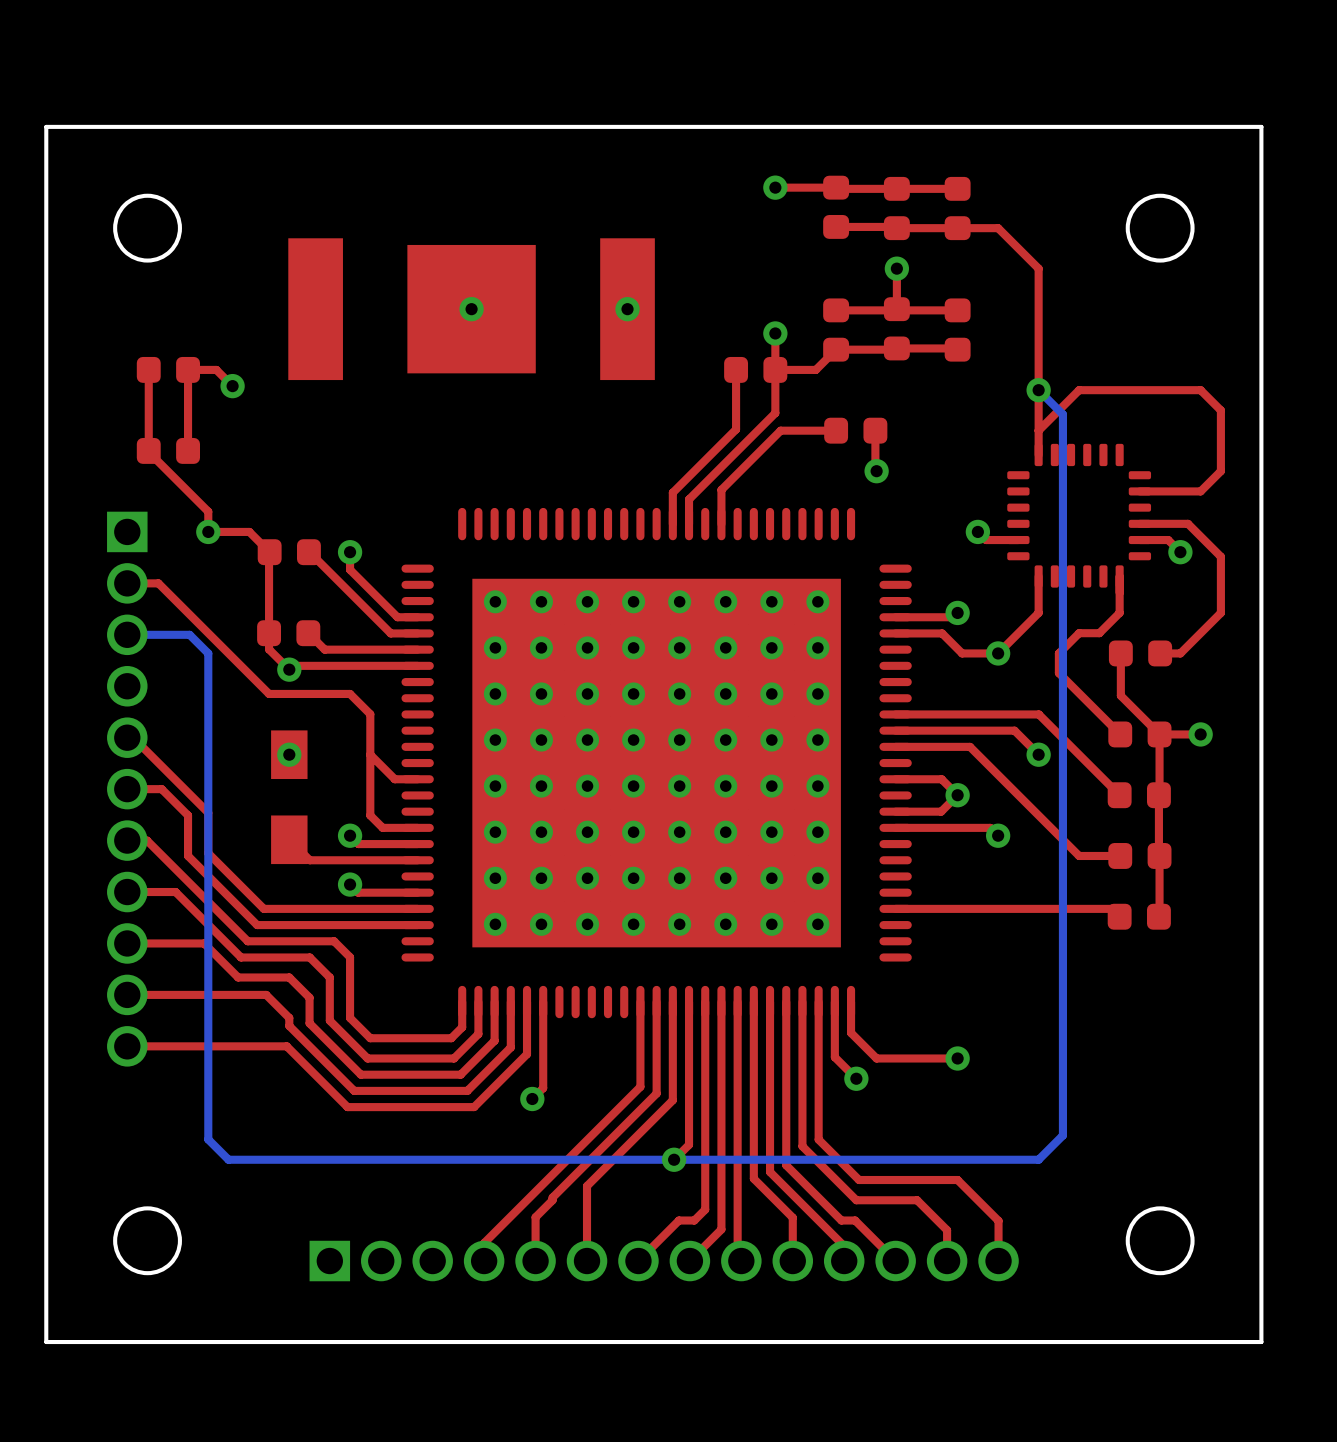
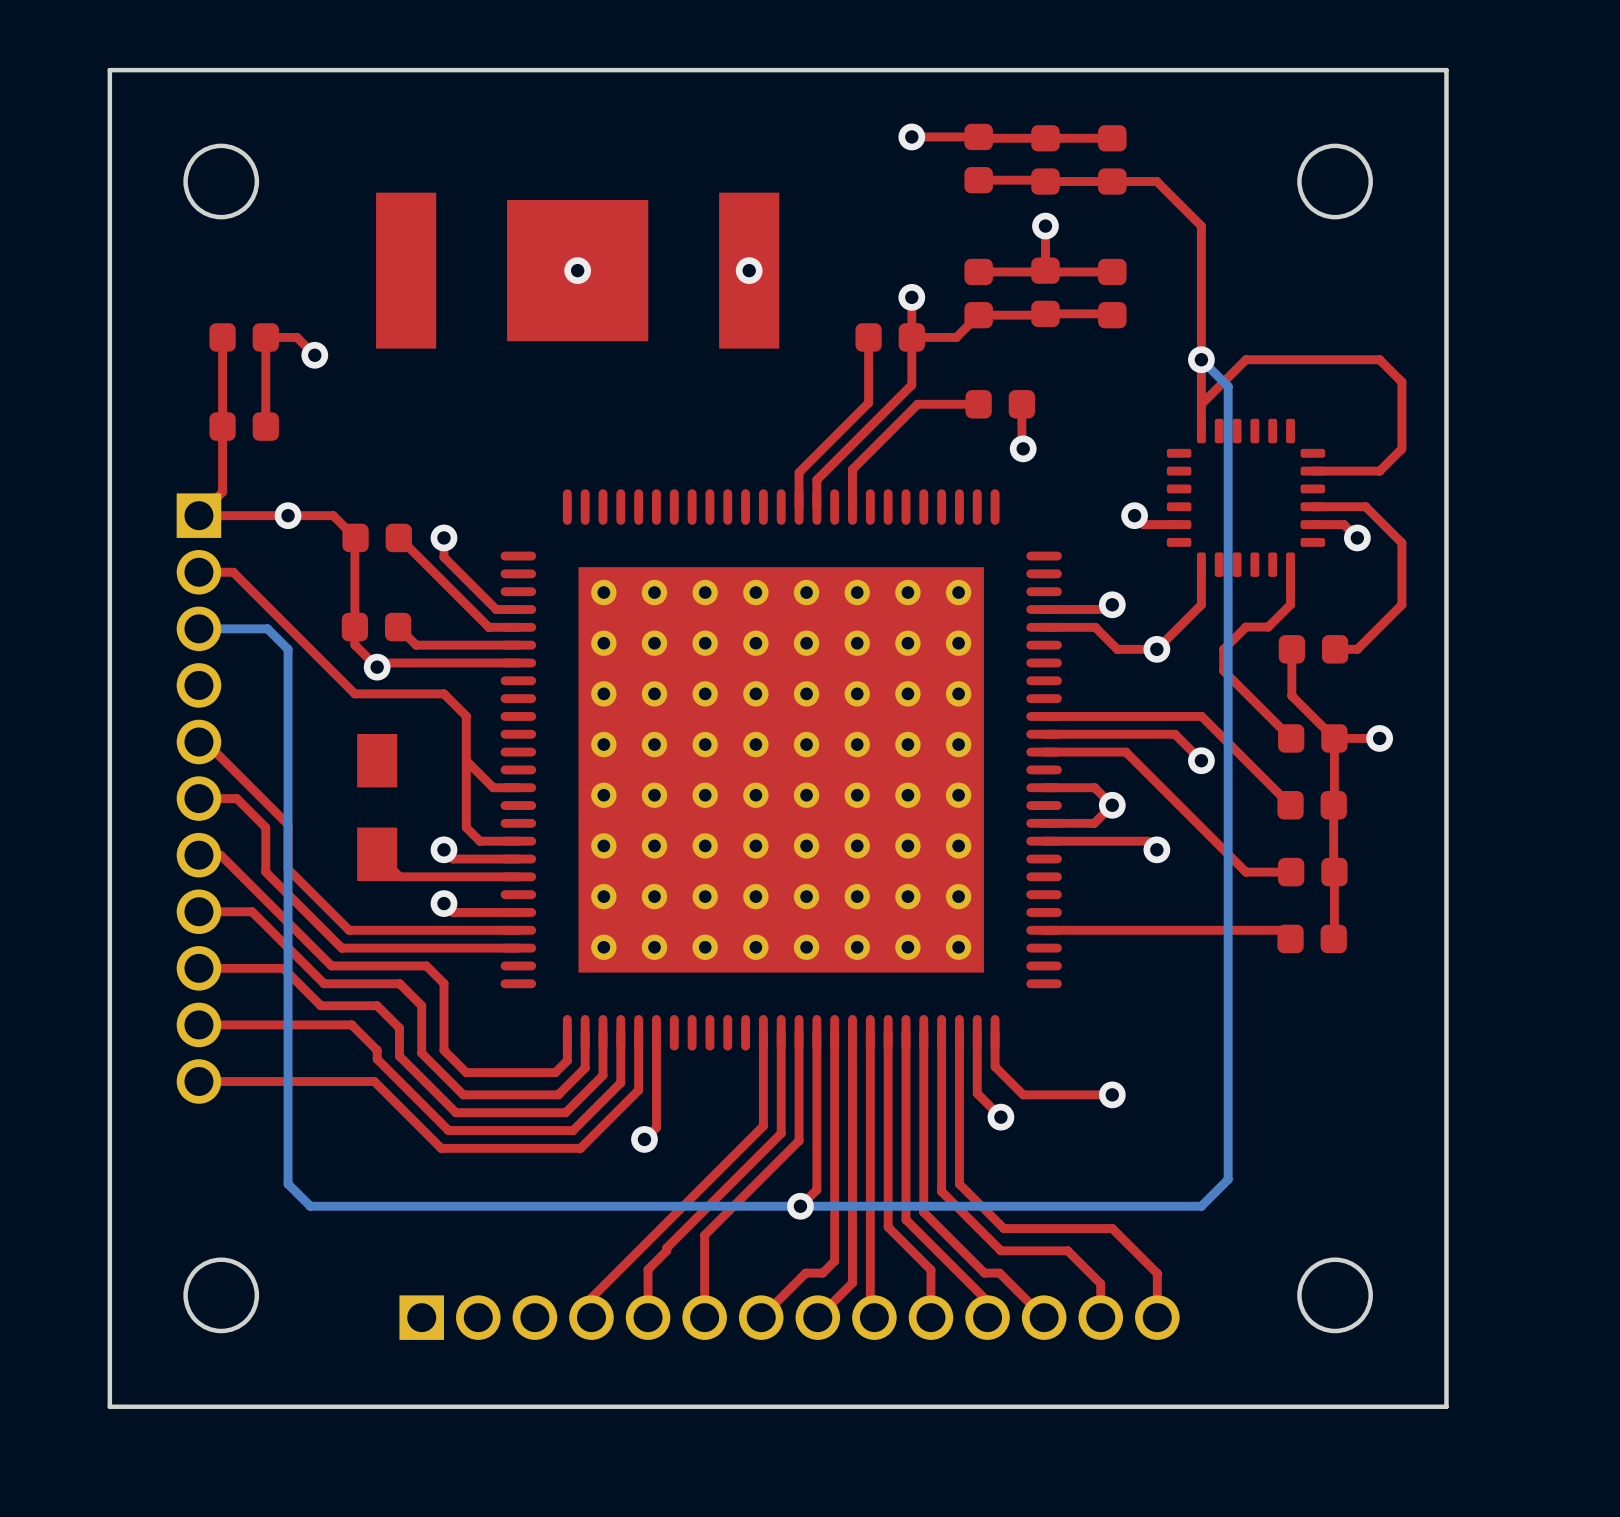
top track: (148, 452) (208, 511) (208, 531) -> (222, 427) (222, 492) (198, 515) (288, 515)
via: (289, 754) -> none

